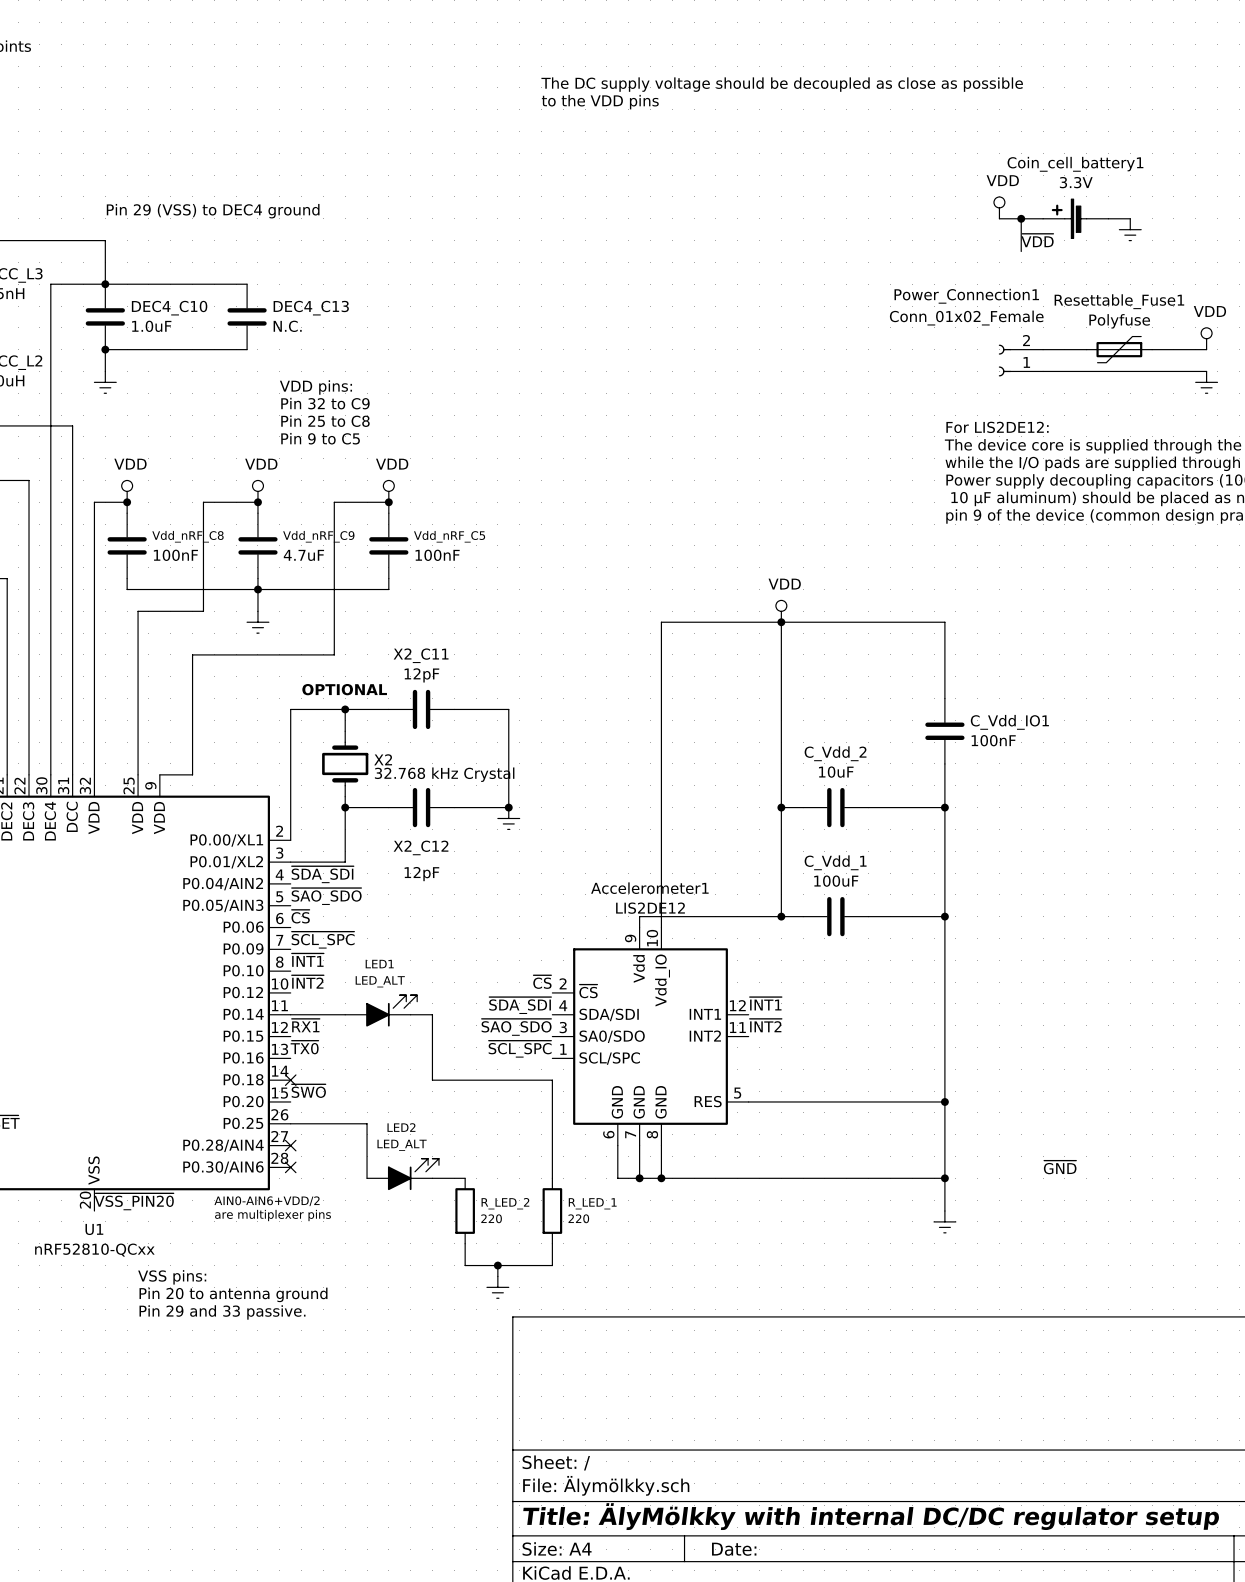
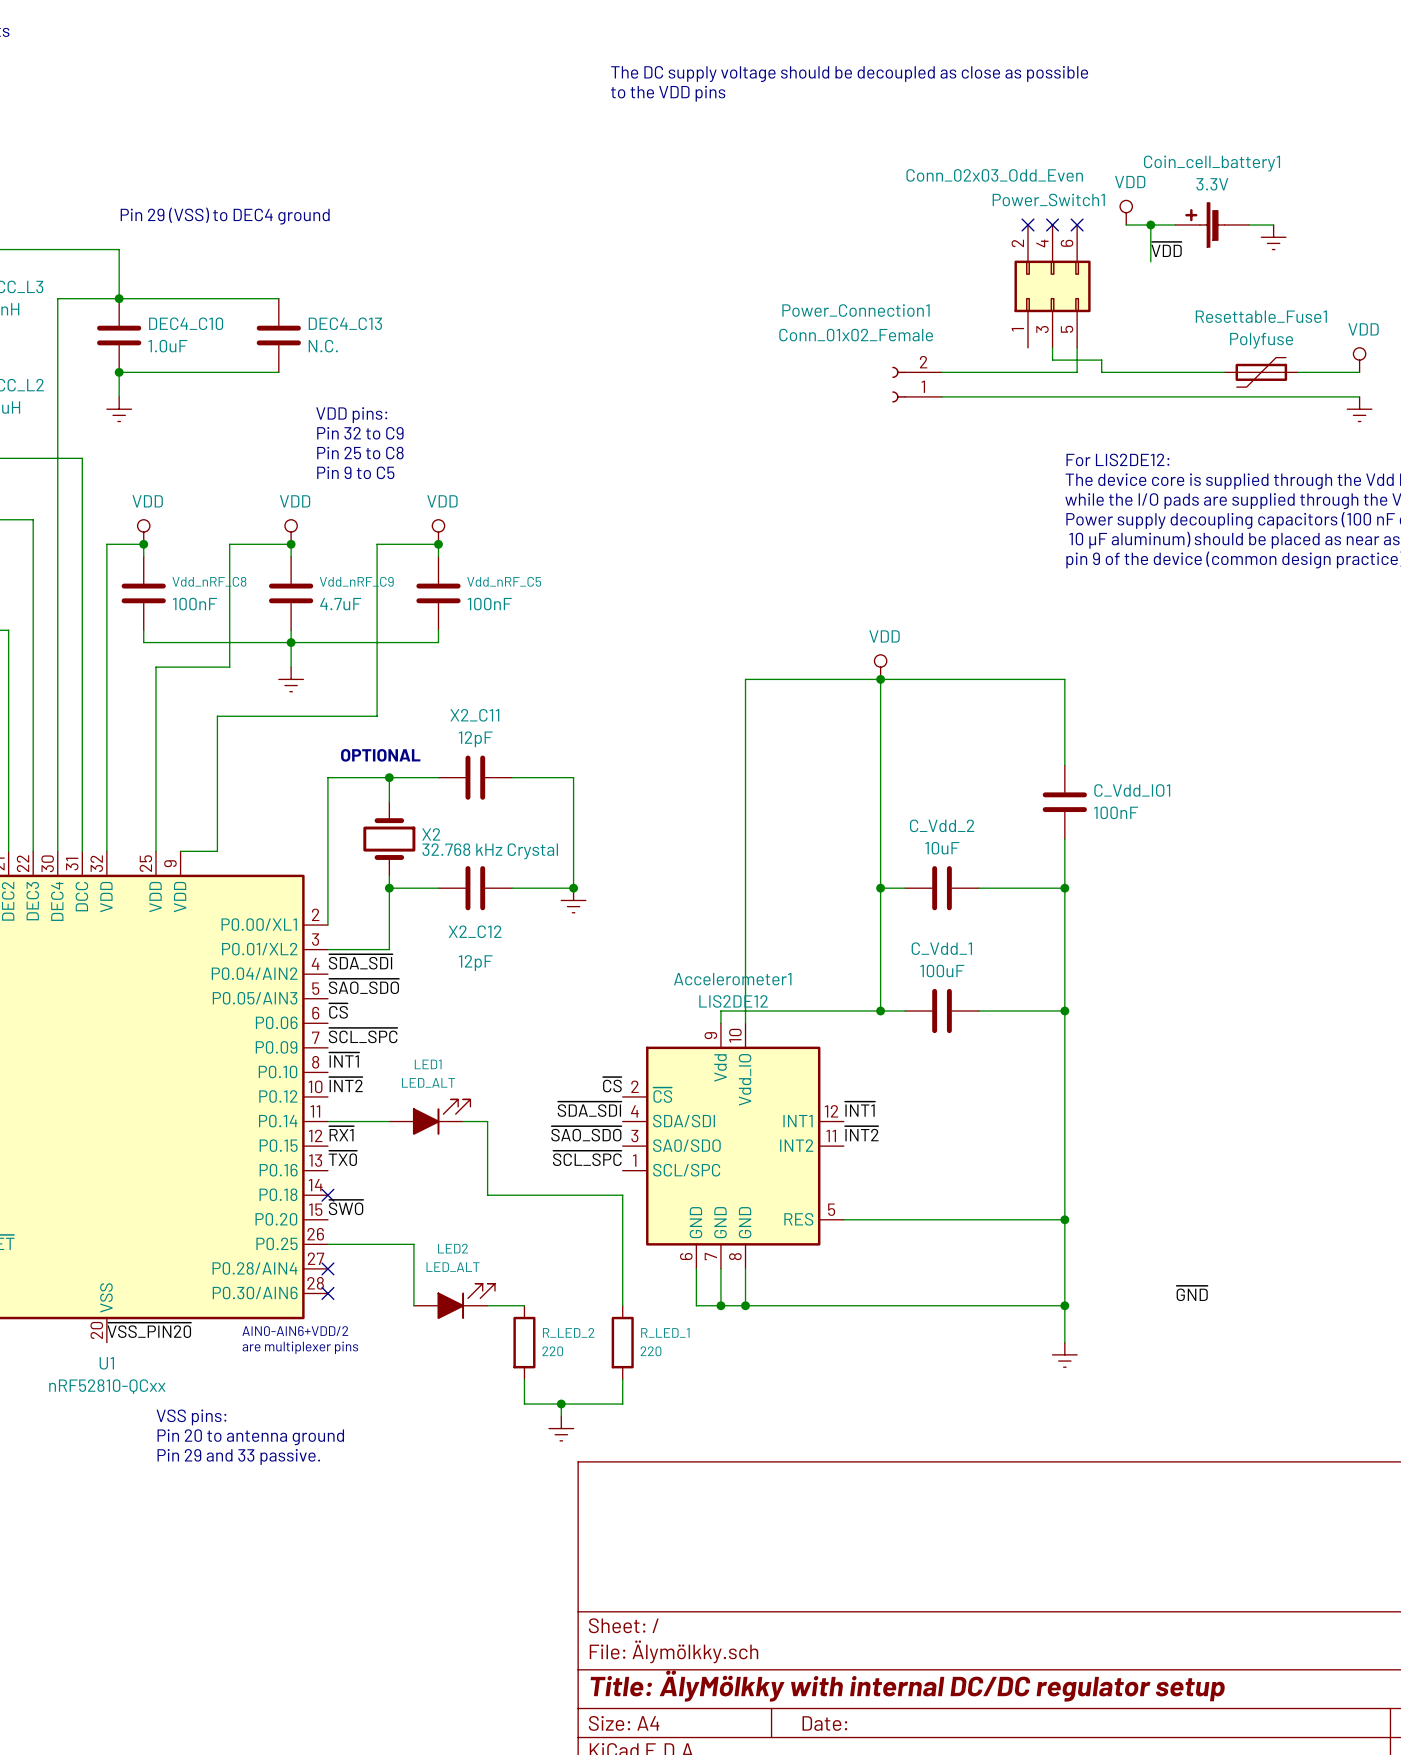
no-connect mark: none -> (1027, 224)
no-connect mark: none -> (1052, 224)
no-connect mark: none -> (1077, 224)
Power_Switch1: none -> Conn_02x03_Odd_Even (1052, 286)
wire: none -> (1052, 347) (1052, 360) (1101, 360) (1101, 372) (1175, 372)
wire: none -> (1077, 347) (1077, 372) (942, 372)
Power_Connection1 position: (1020, 360) -> (917, 384)
wire: none -> (942, 396) (1175, 396)

